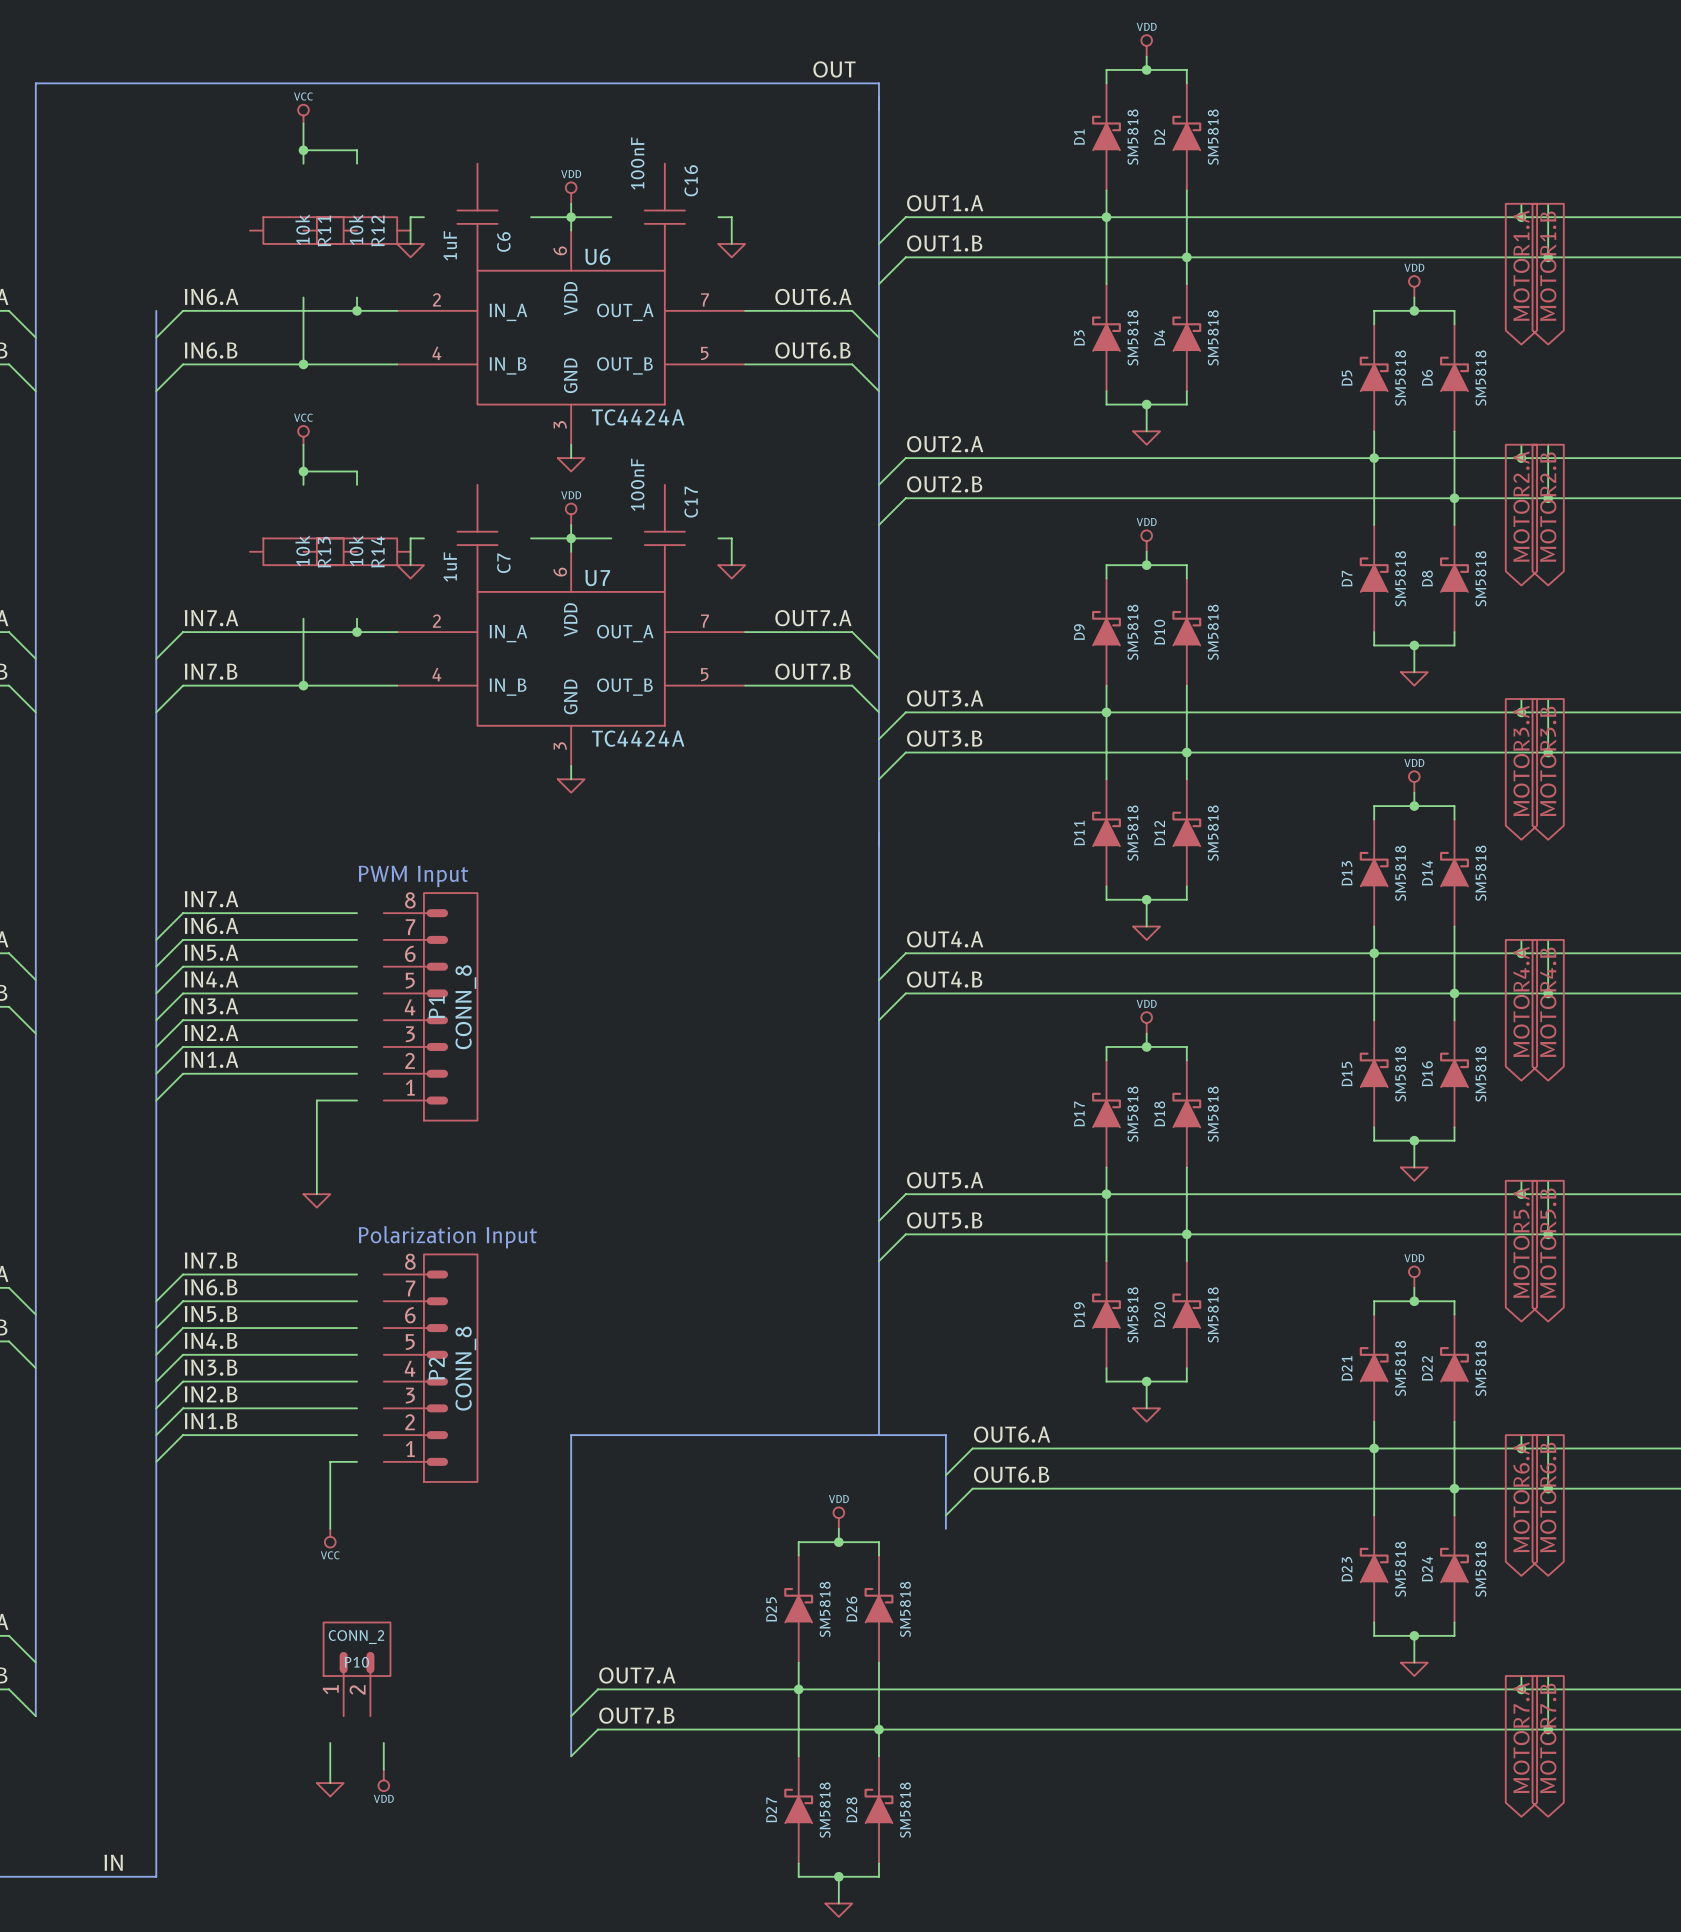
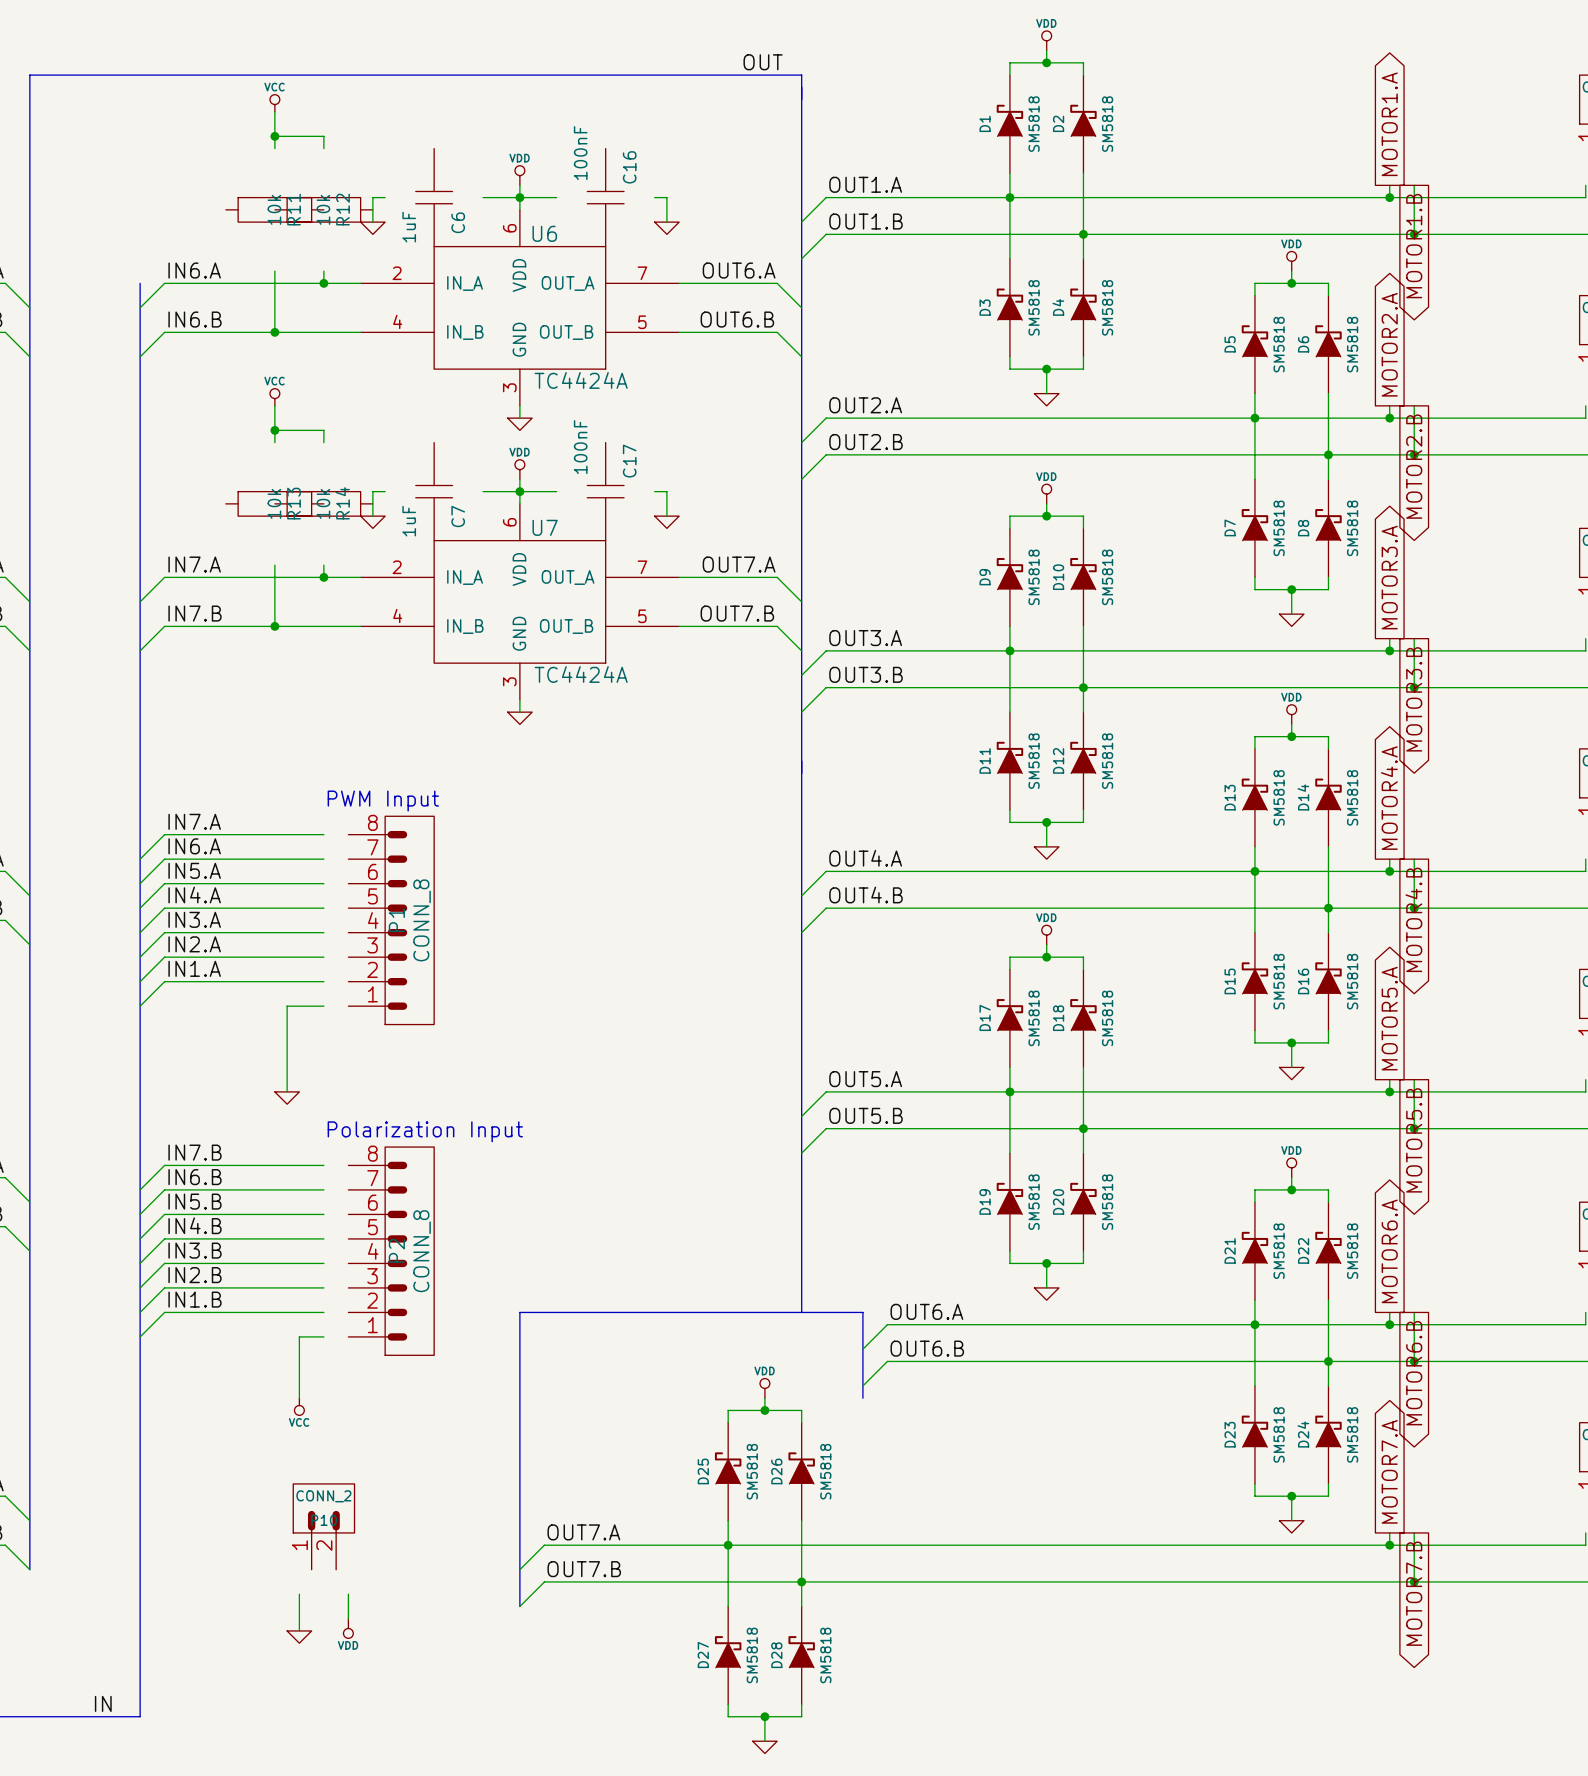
global label rotation: 0° (1521, 265) -> 180° (1389, 124)
global label position: MOTOR1.A (1521, 265) -> MOTOR1.A (1389, 124)
global label rotation: 0° (1521, 506) -> 180° (1389, 344)
global label position: MOTOR2.A (1521, 506) -> MOTOR2.A (1389, 344)
global label rotation: 0° (1521, 760) -> 180° (1389, 577)
global label rotation: 0° (1521, 1001) -> 180° (1389, 798)
global label rotation: 0° (1521, 1242) -> 180° (1389, 1018)
global label rotation: 0° (1521, 1497) -> 180° (1389, 1251)
global label rotation: 0° (1521, 1738) -> 180° (1389, 1471)

